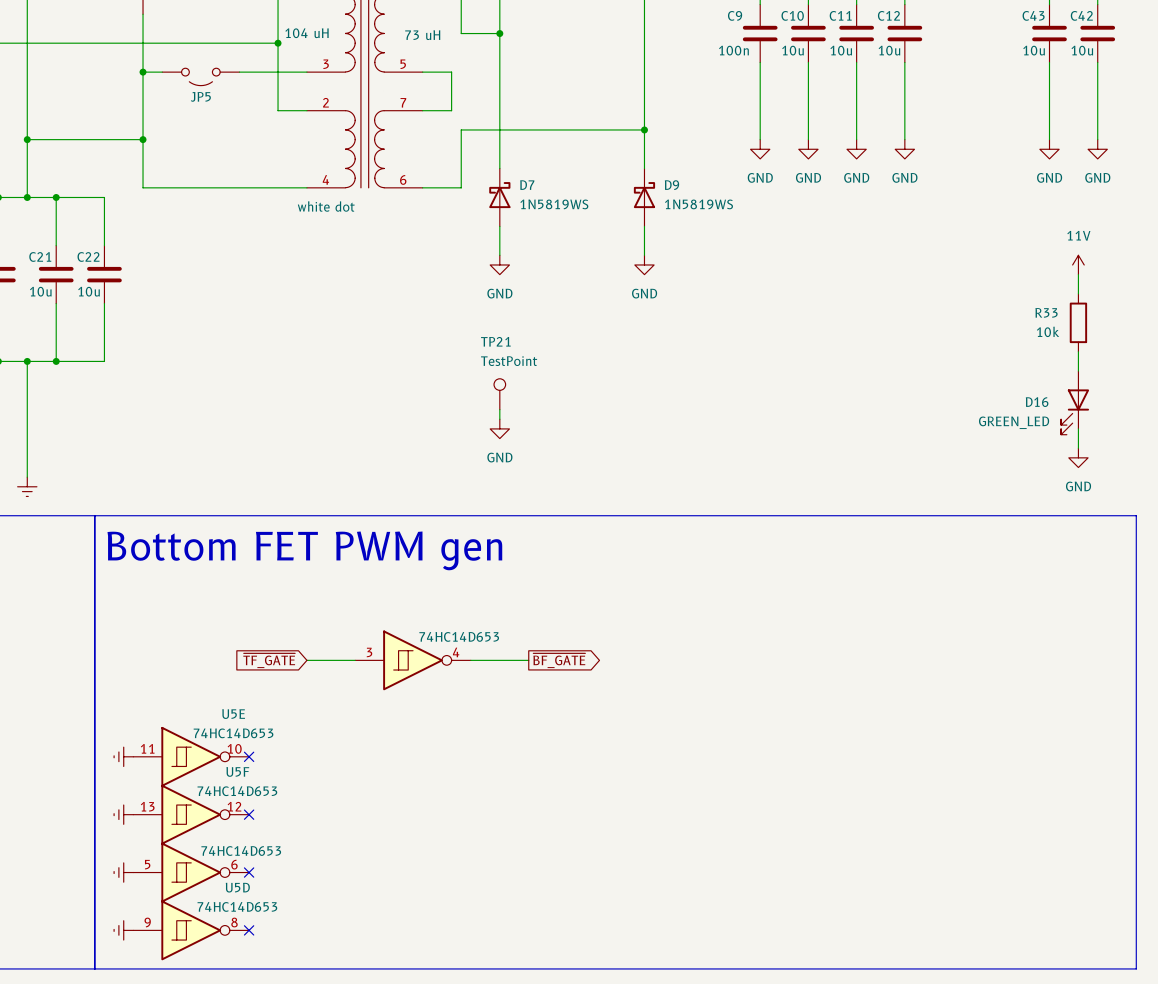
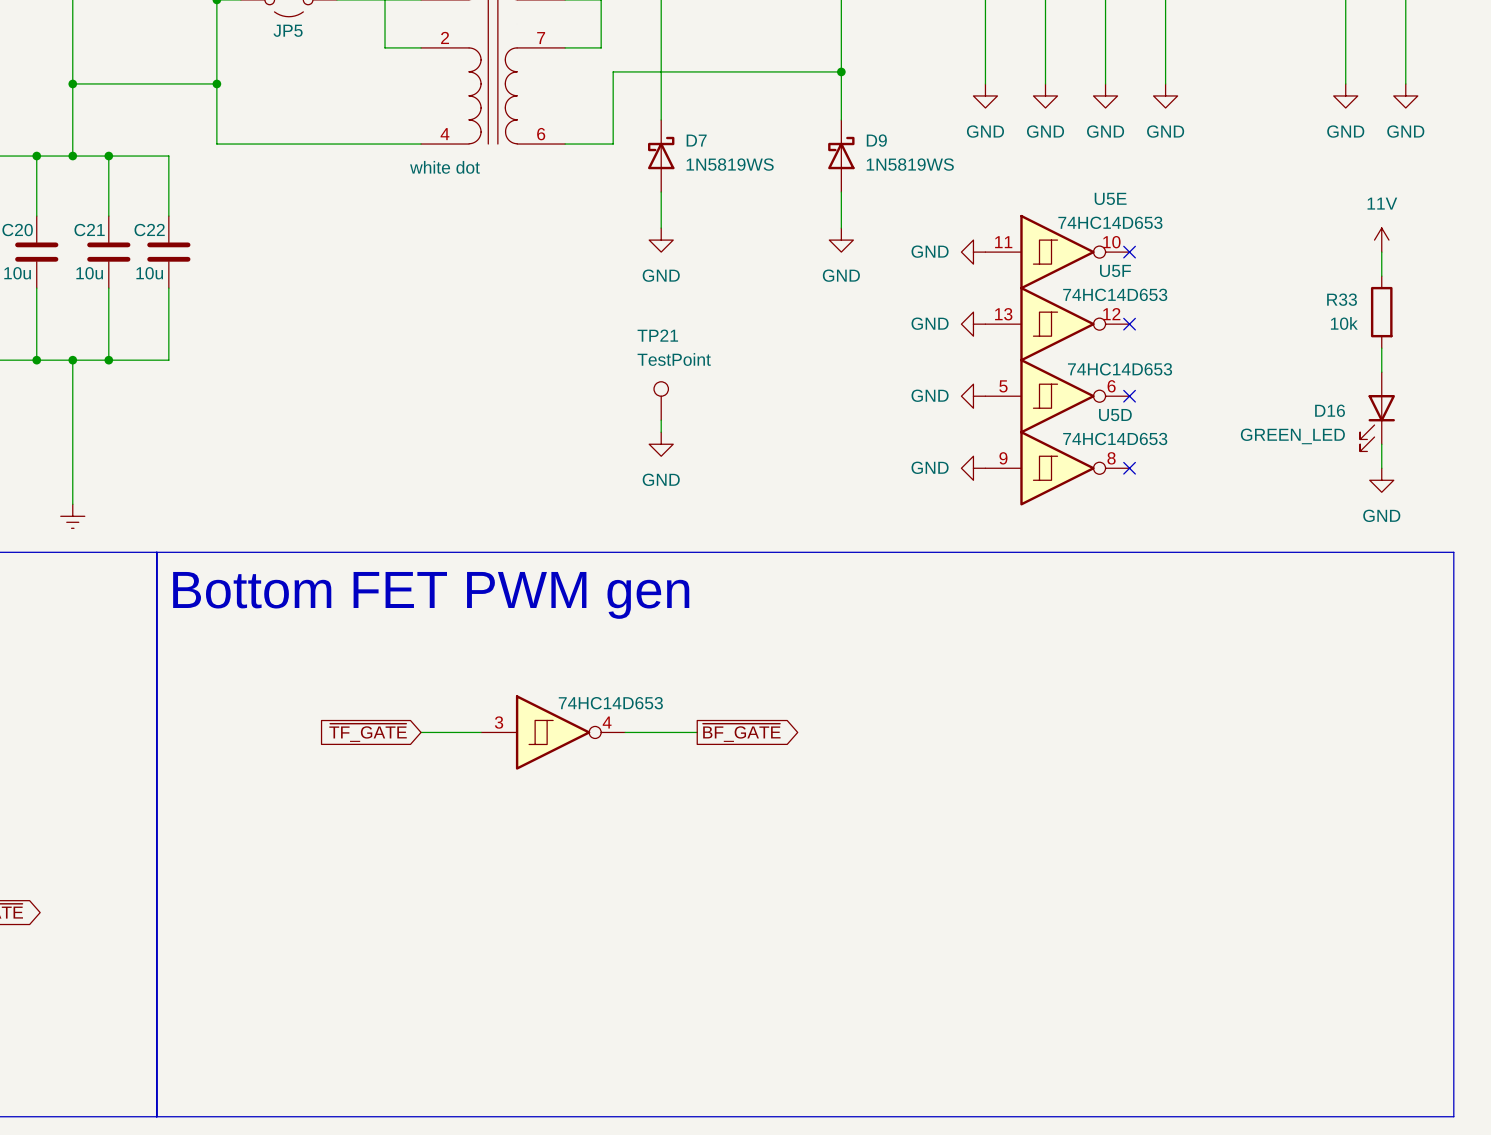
power symbol: none -> GND (973, 252)
no-connect mark: none -> (1129, 252)
power symbol: none -> GND (973, 324)
no-connect mark: none -> (1129, 324)
power symbol: none -> GND (973, 396)
part: none -> 74HC14D653 (1057, 396)
no-connect mark: none -> (1129, 396)
power symbol: none -> GND (973, 468)
no-connect mark: none -> (1129, 468)
power symbol: (123, 756) -> none
U5E position: (191, 756) -> (1057, 252)
no-connect mark: (249, 756) -> none
power symbol: (123, 814) -> none
U5F position: (191, 814) -> (1057, 324)
no-connect mark: (249, 814) -> none
power symbol: (123, 872) -> none
part: 74HC14D653 (191, 872) -> none
no-connect mark: (249, 872) -> none
power symbol: (123, 930) -> none
U5D position: (191, 930) -> (1057, 468)
no-connect mark: (249, 930) -> none

